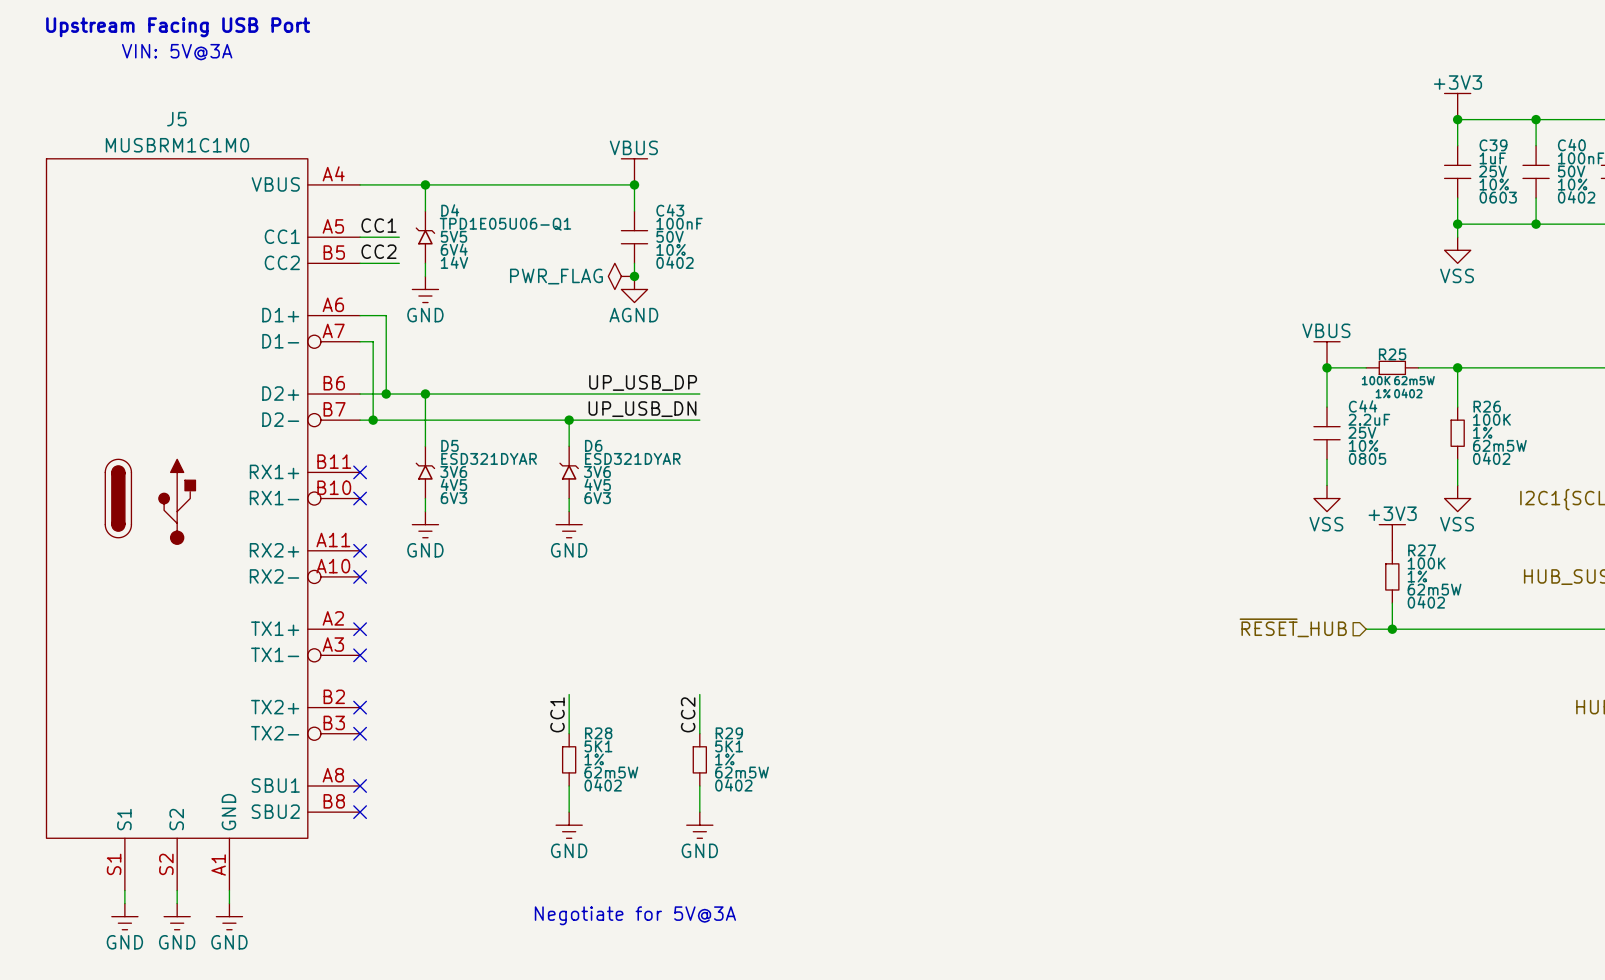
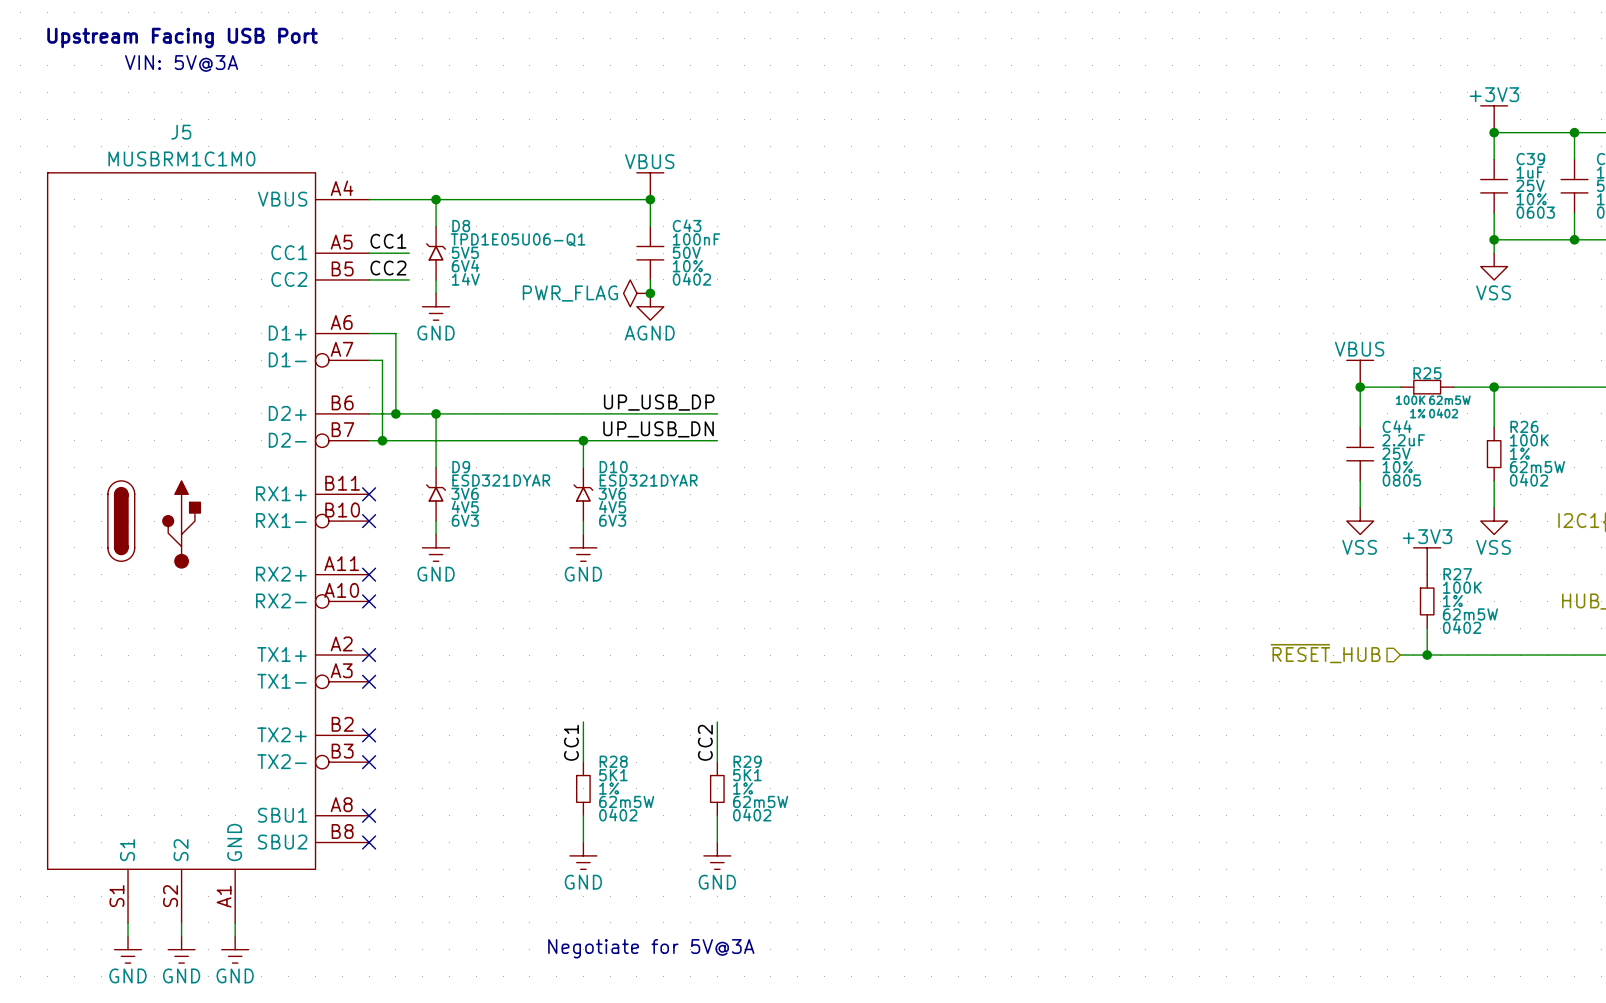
D4 name: D4 (450, 210) -> D8 (461, 226)
D5 name: D5 (449, 445) -> D9 (461, 467)
D6 name: D6 (593, 445) -> D10 (613, 467)

